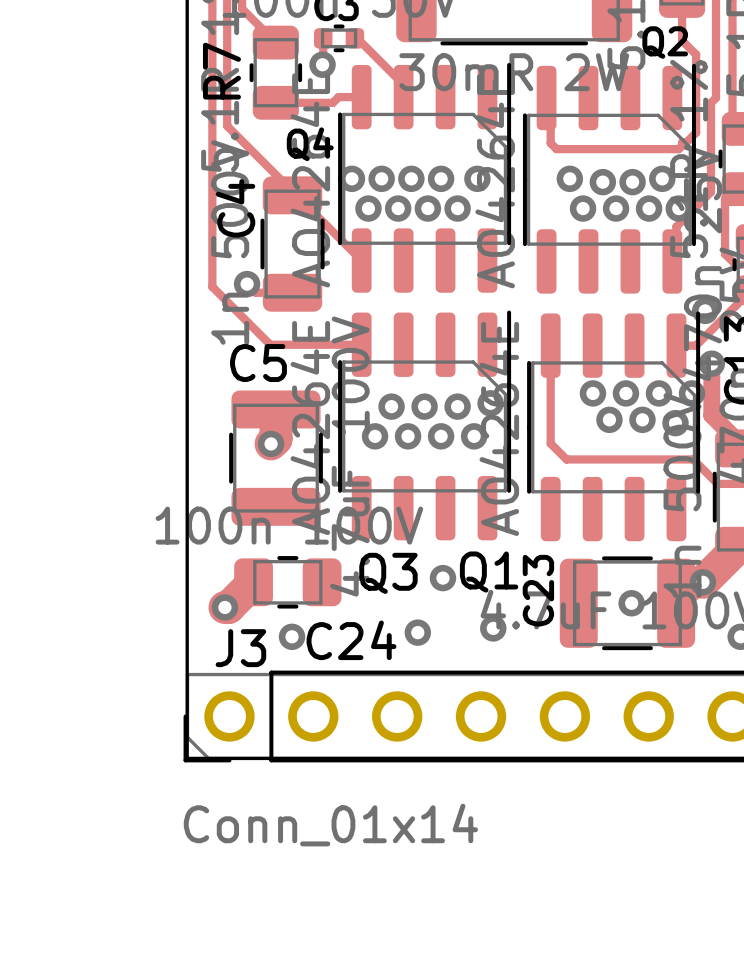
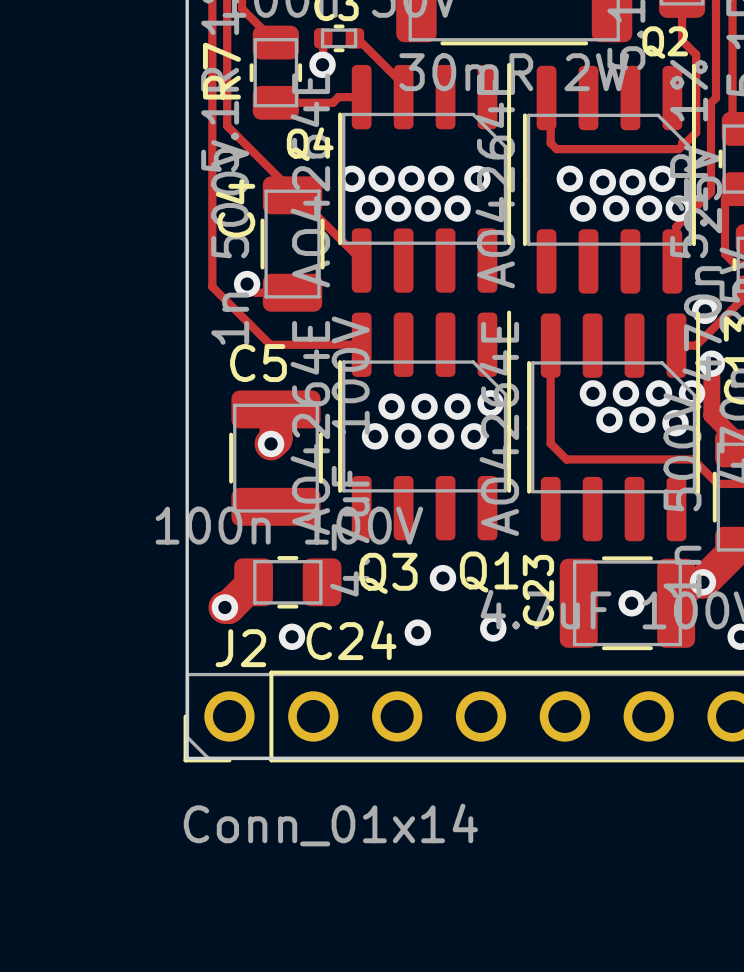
J3 name: J3 (240, 648) -> J2 (240, 648)

